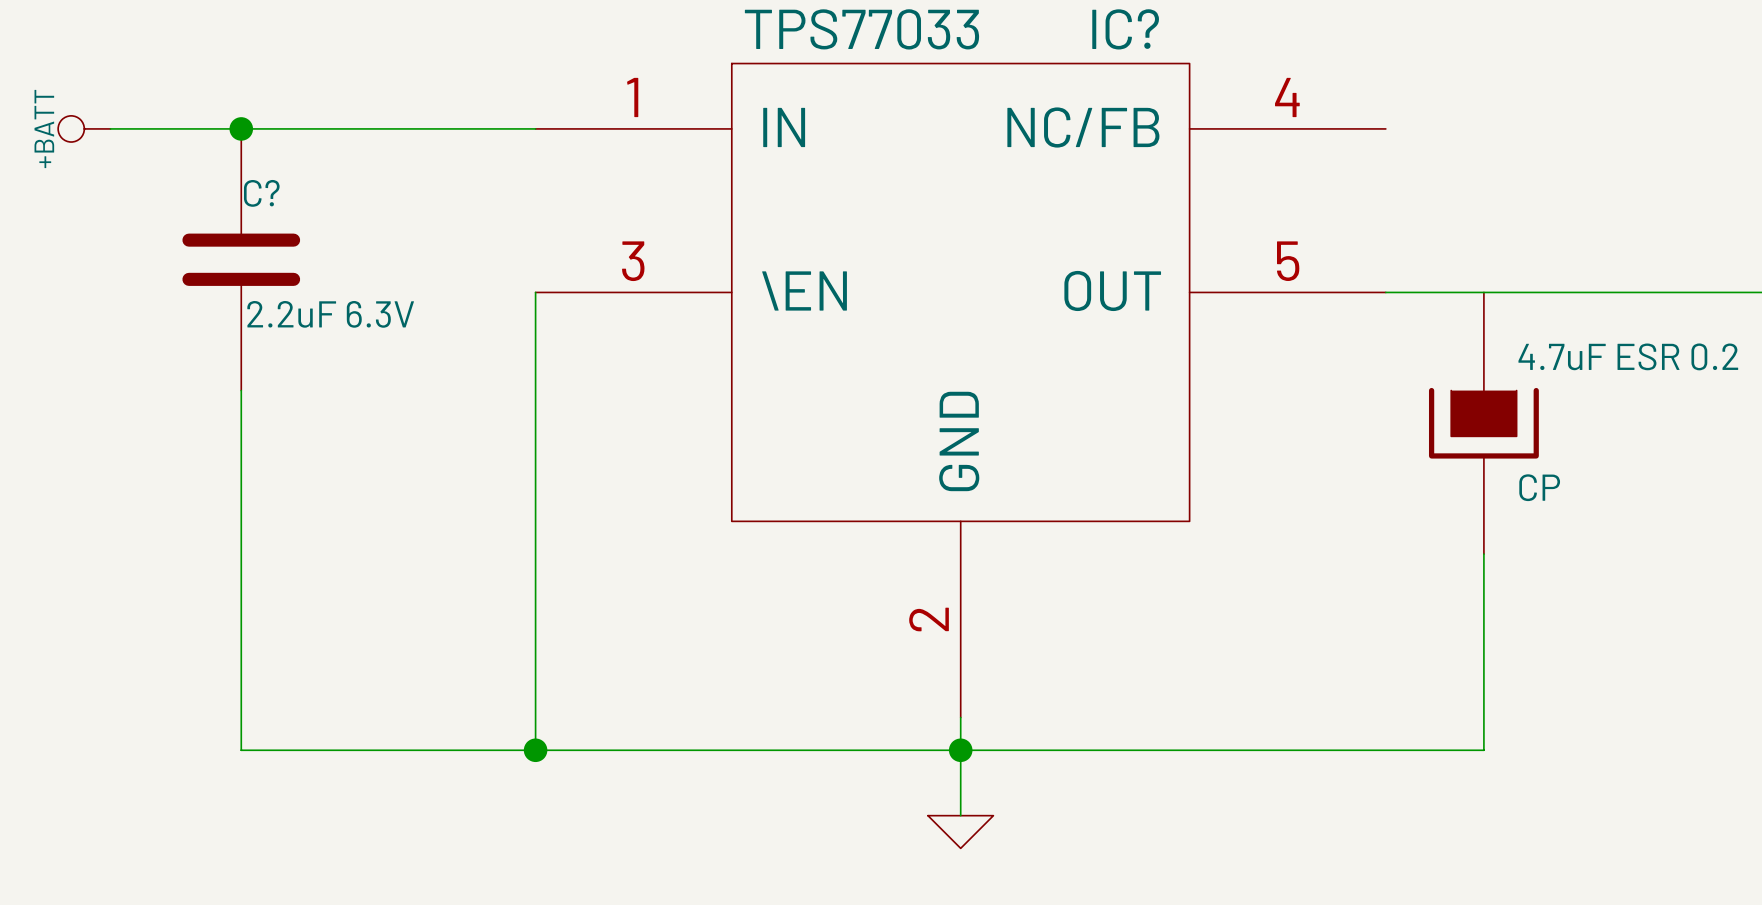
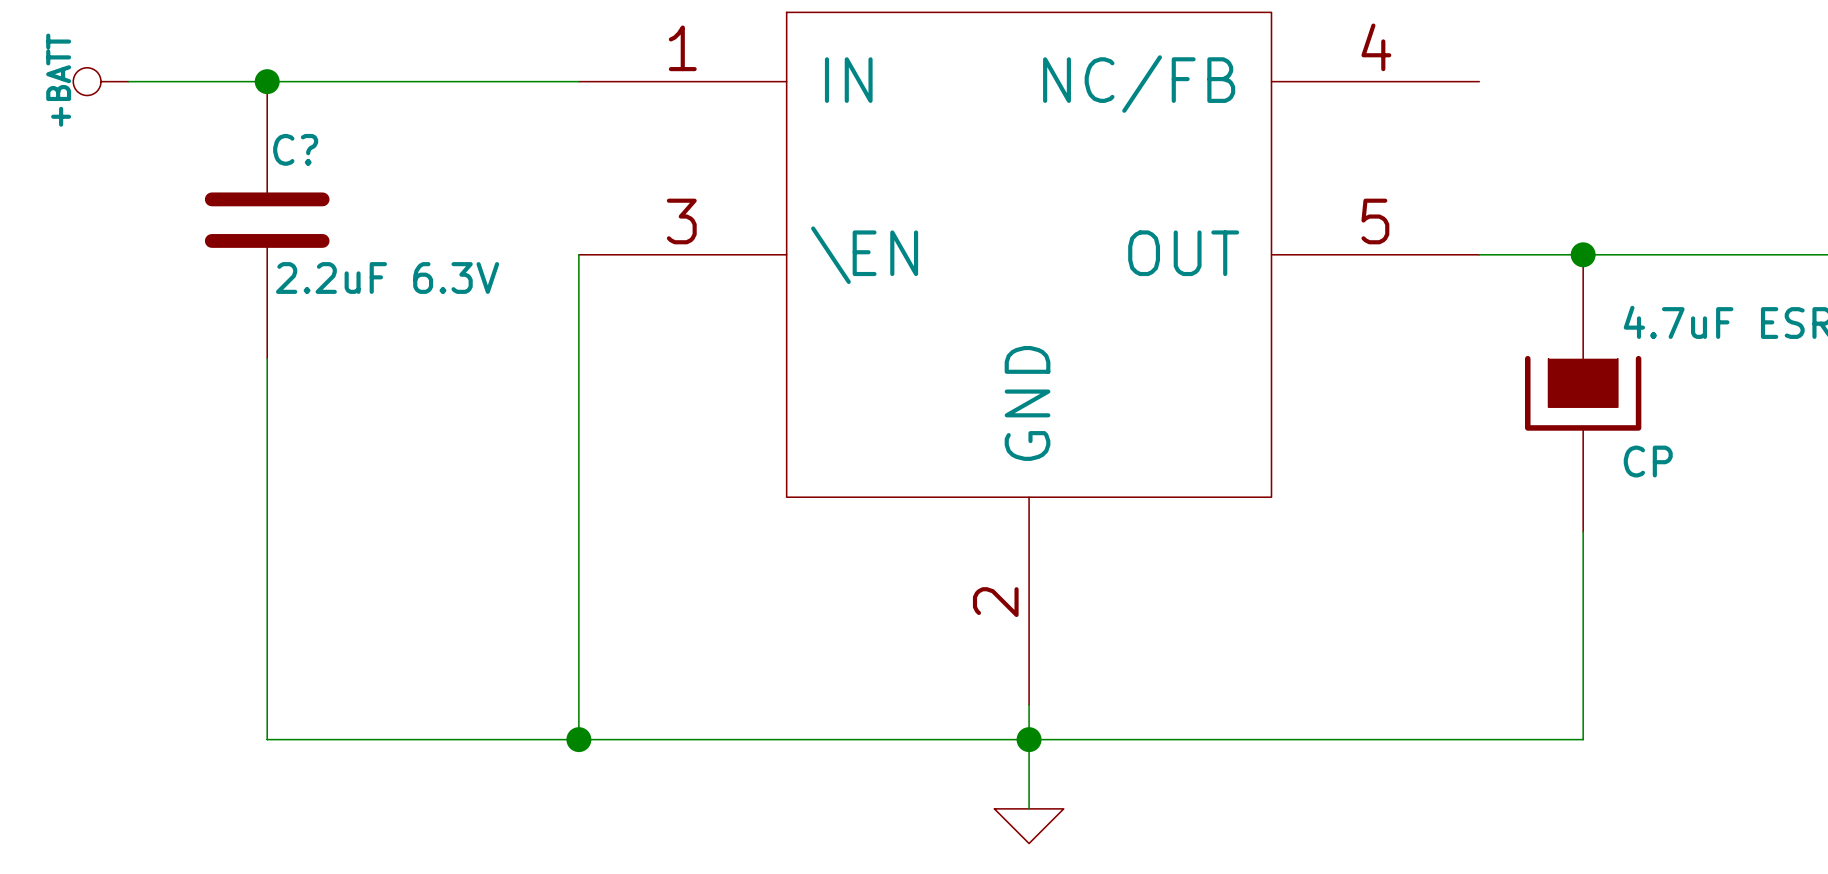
junction: none -> (1583, 254)

